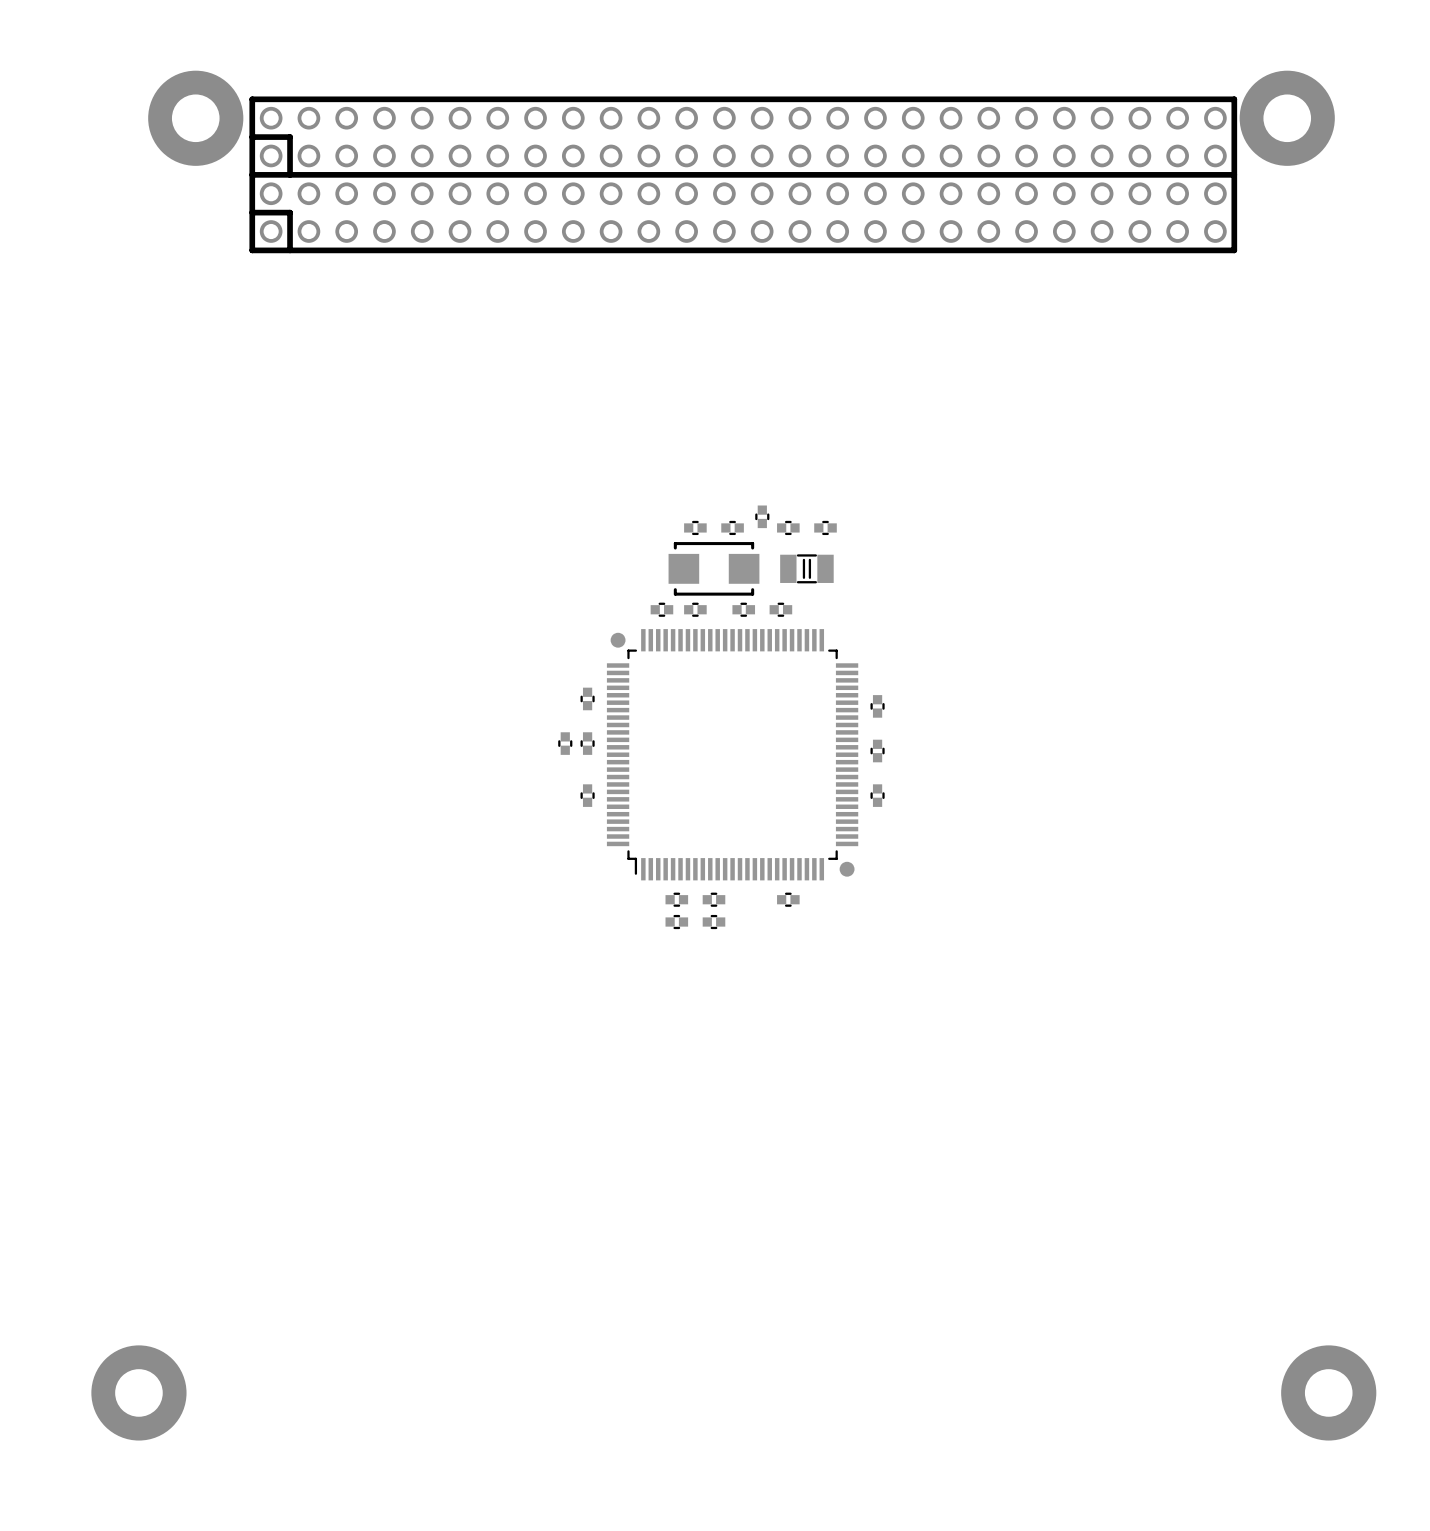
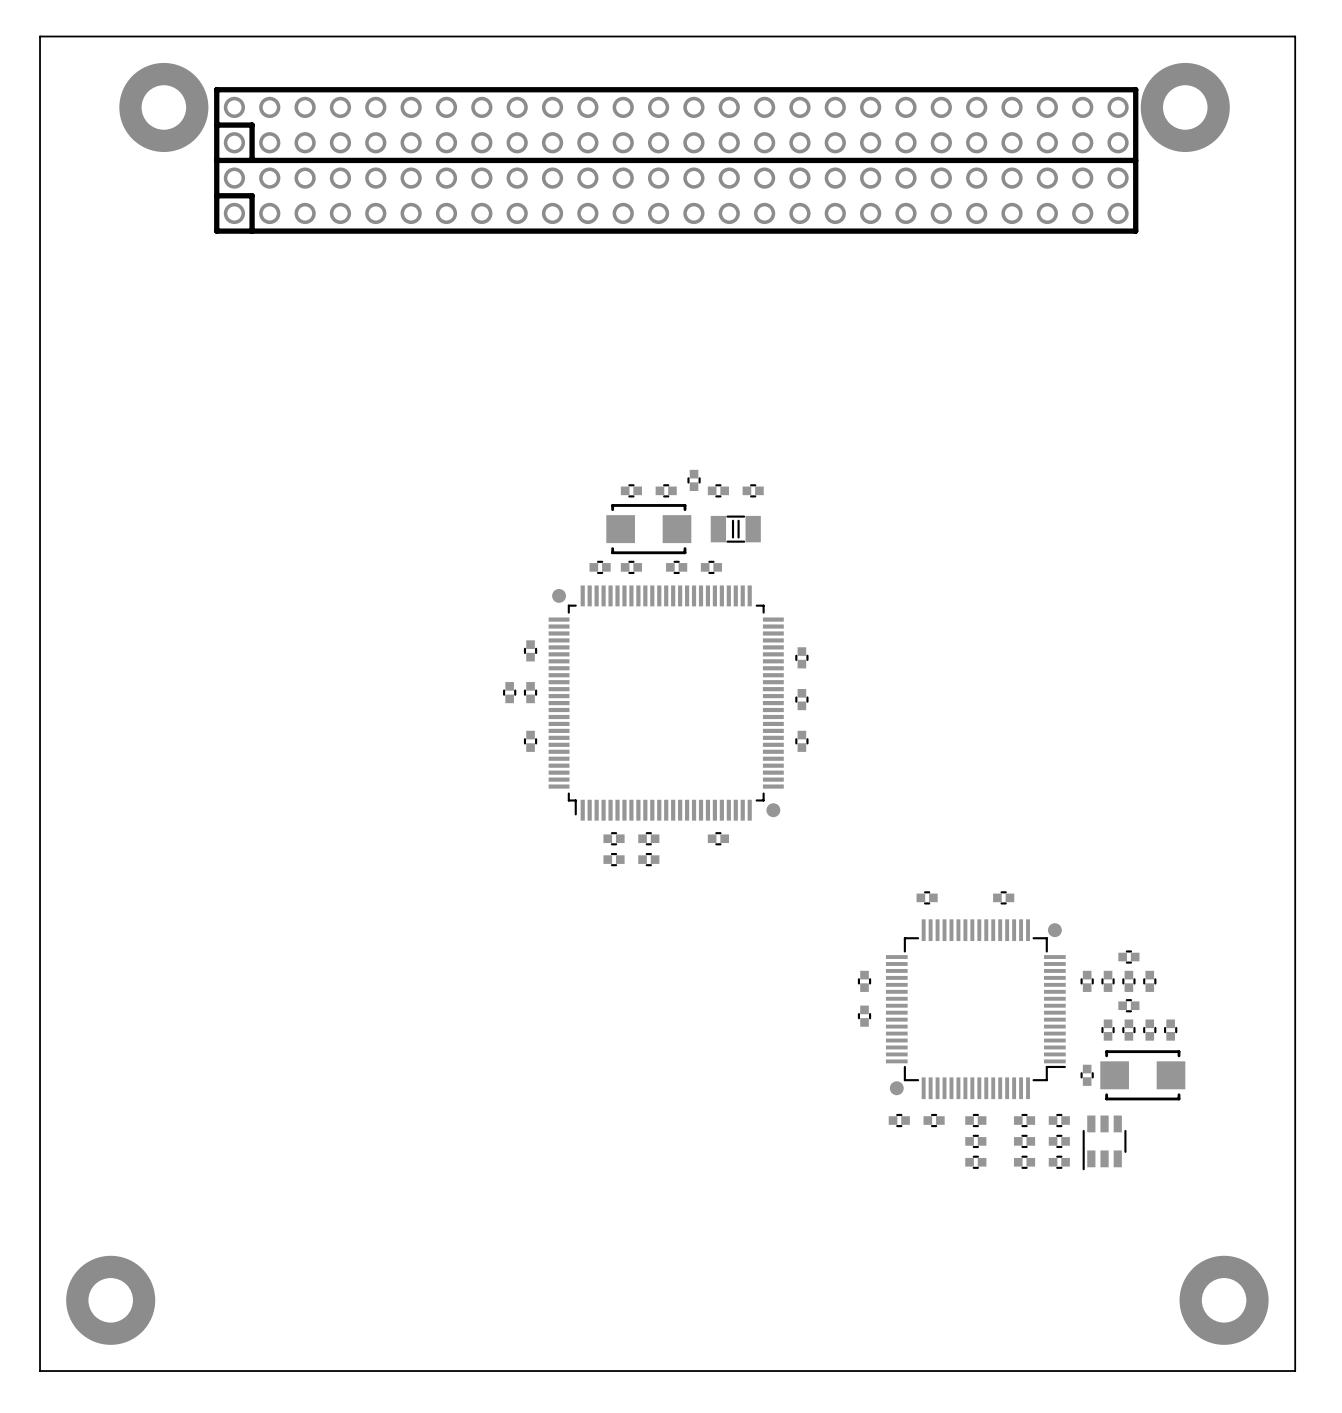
board edge: none -> (40, 36) (40, 1371) (1295, 1371) (1295, 36) (40, 36)
part: none -> (927, 897)
part: none -> (1003, 897)
part: none -> (1128, 957)
part: none -> (864, 981)
part: none -> (1087, 981)
part: none -> (1108, 981)
part: none -> (1128, 981)
part: none -> (1149, 981)
part: none -> (1128, 1005)
part: none -> (975, 1009)
part: none -> (864, 1016)
part: none -> (1108, 1030)
part: none -> (1128, 1030)
part: none -> (1149, 1030)
part: none -> (1170, 1030)
part: none -> (1087, 1075)
part: none -> (1142, 1075)
part: none -> (899, 1120)
part: none -> (934, 1120)
part: none -> (975, 1120)
part: none -> (1024, 1120)
part: none -> (1059, 1120)
part: none -> (975, 1141)
part: none -> (1024, 1141)
part: none -> (1059, 1141)
part: none -> (1104, 1142)
part: none -> (975, 1162)
part: none -> (1024, 1162)
part: none -> (1059, 1162)

